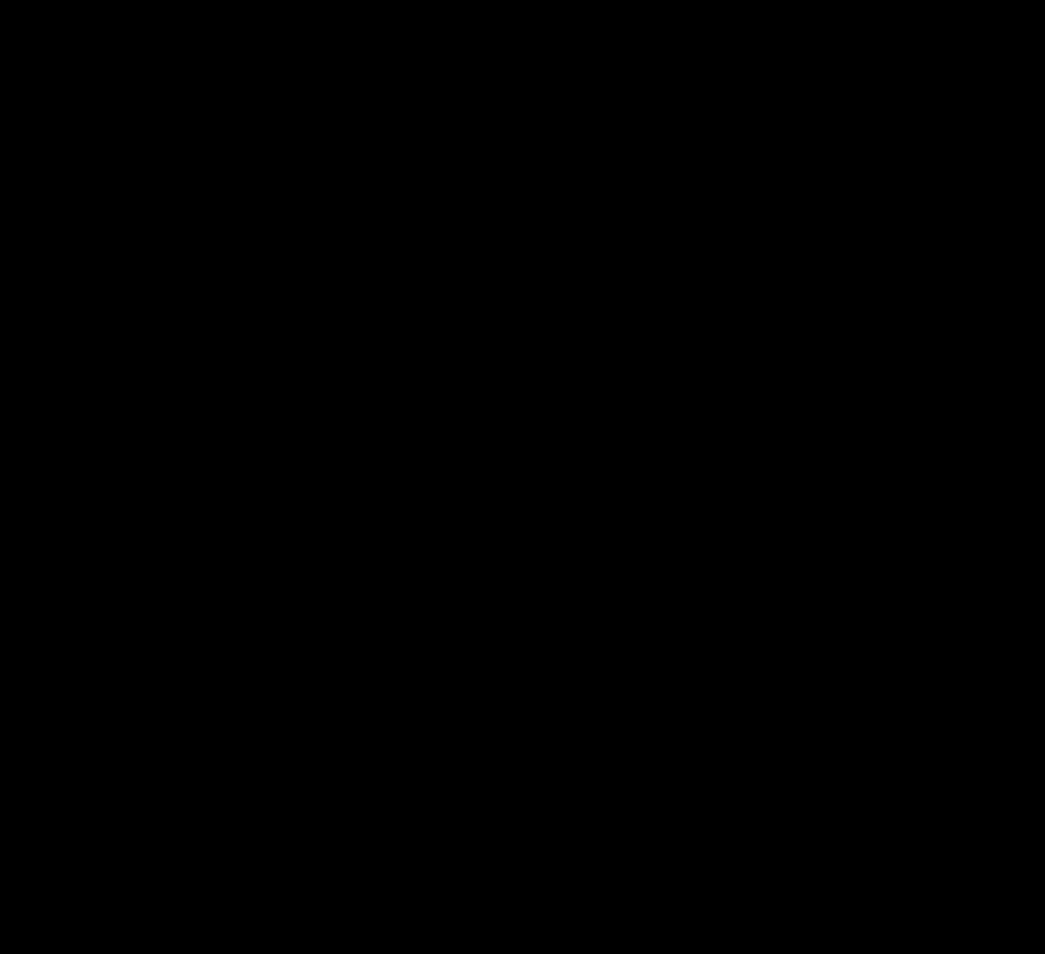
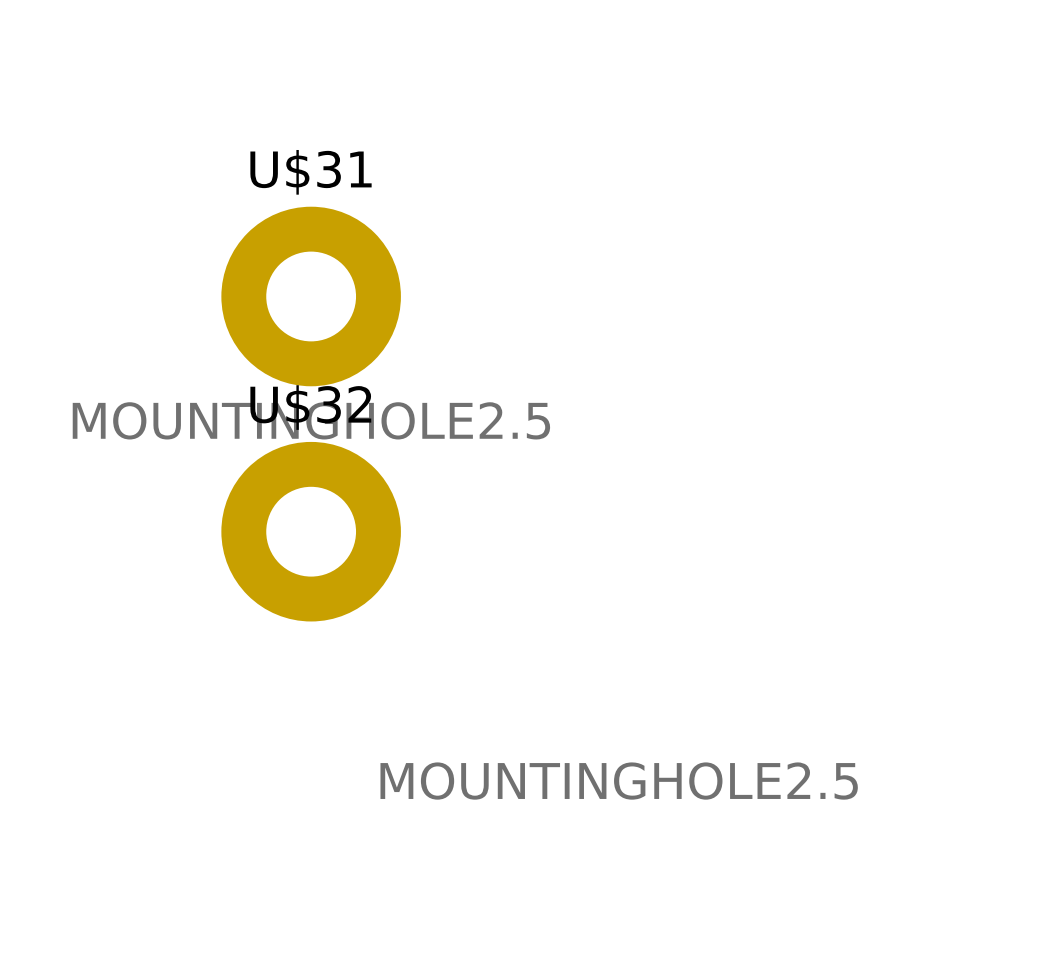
U$31: none -> MOUNTINGHOLE2.5 (311, 296)
U$32: none -> MOUNTINGHOLE2.5 (311, 531)

